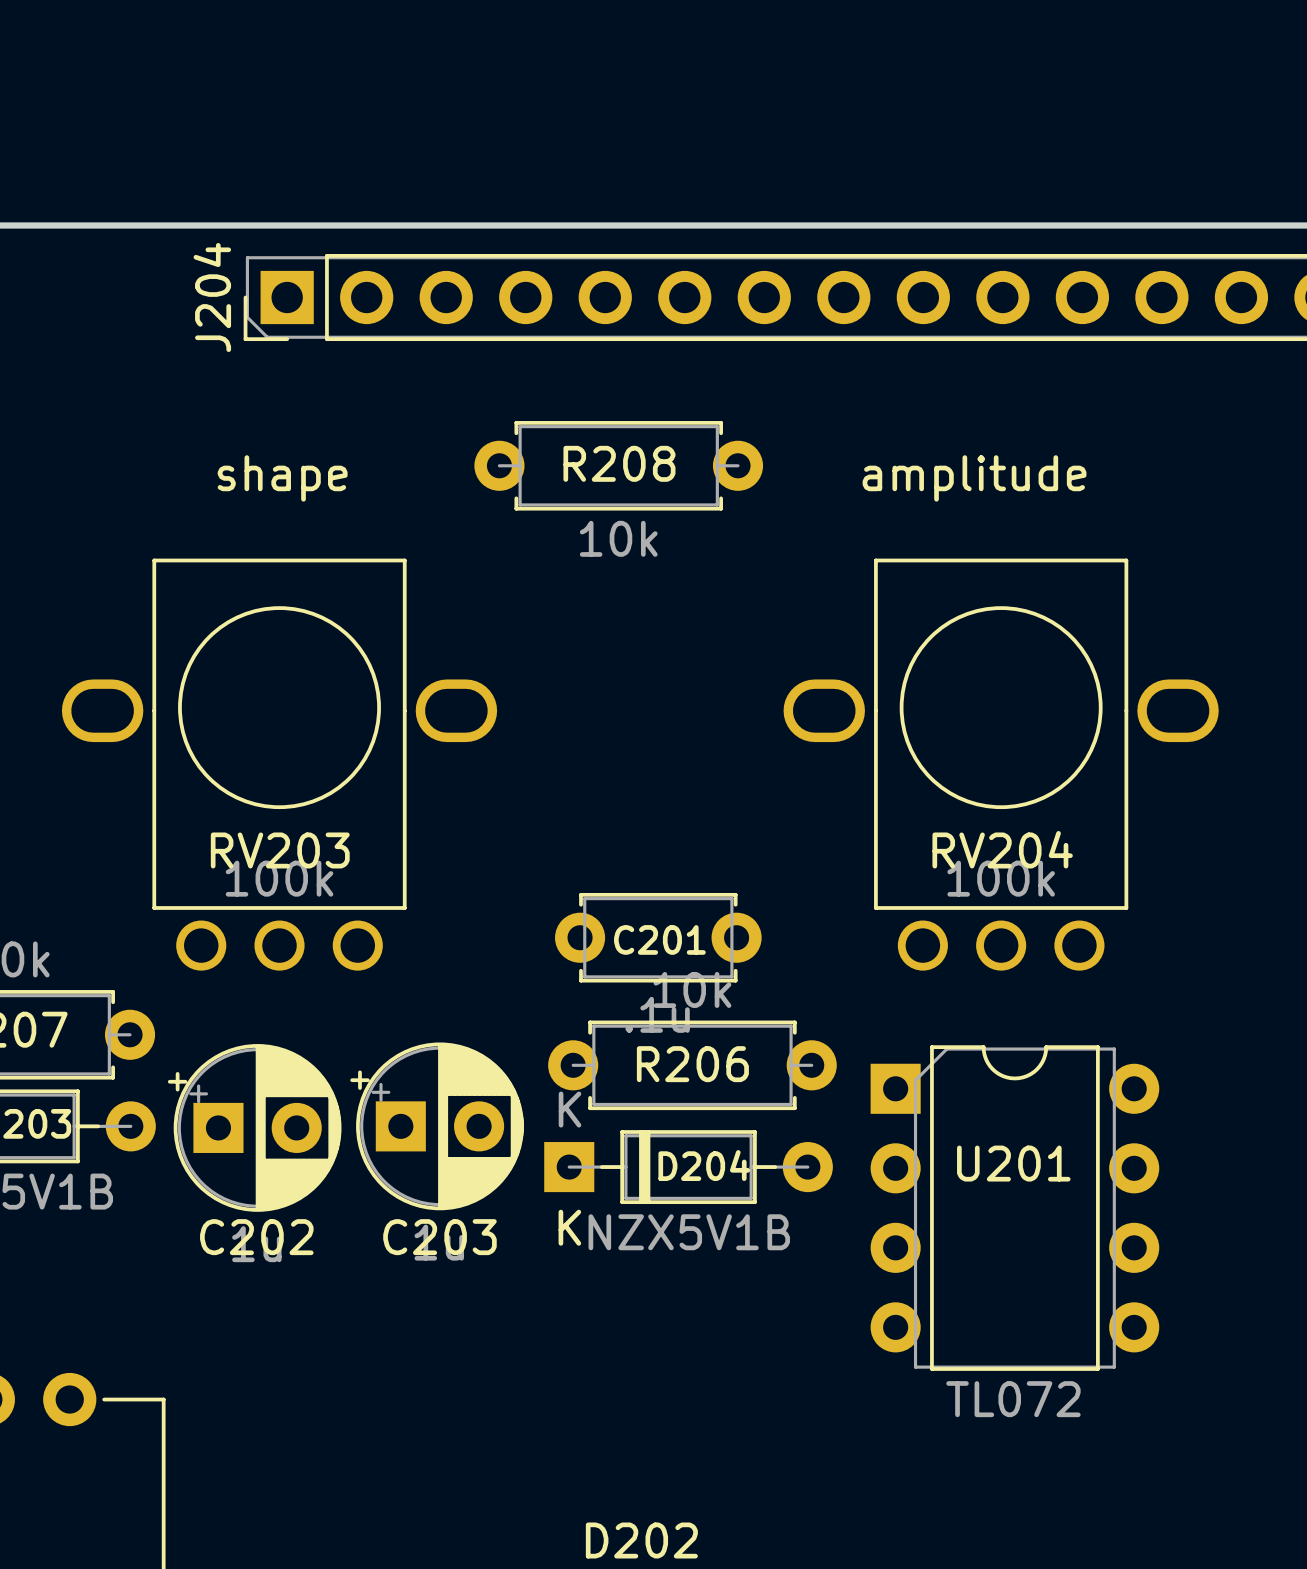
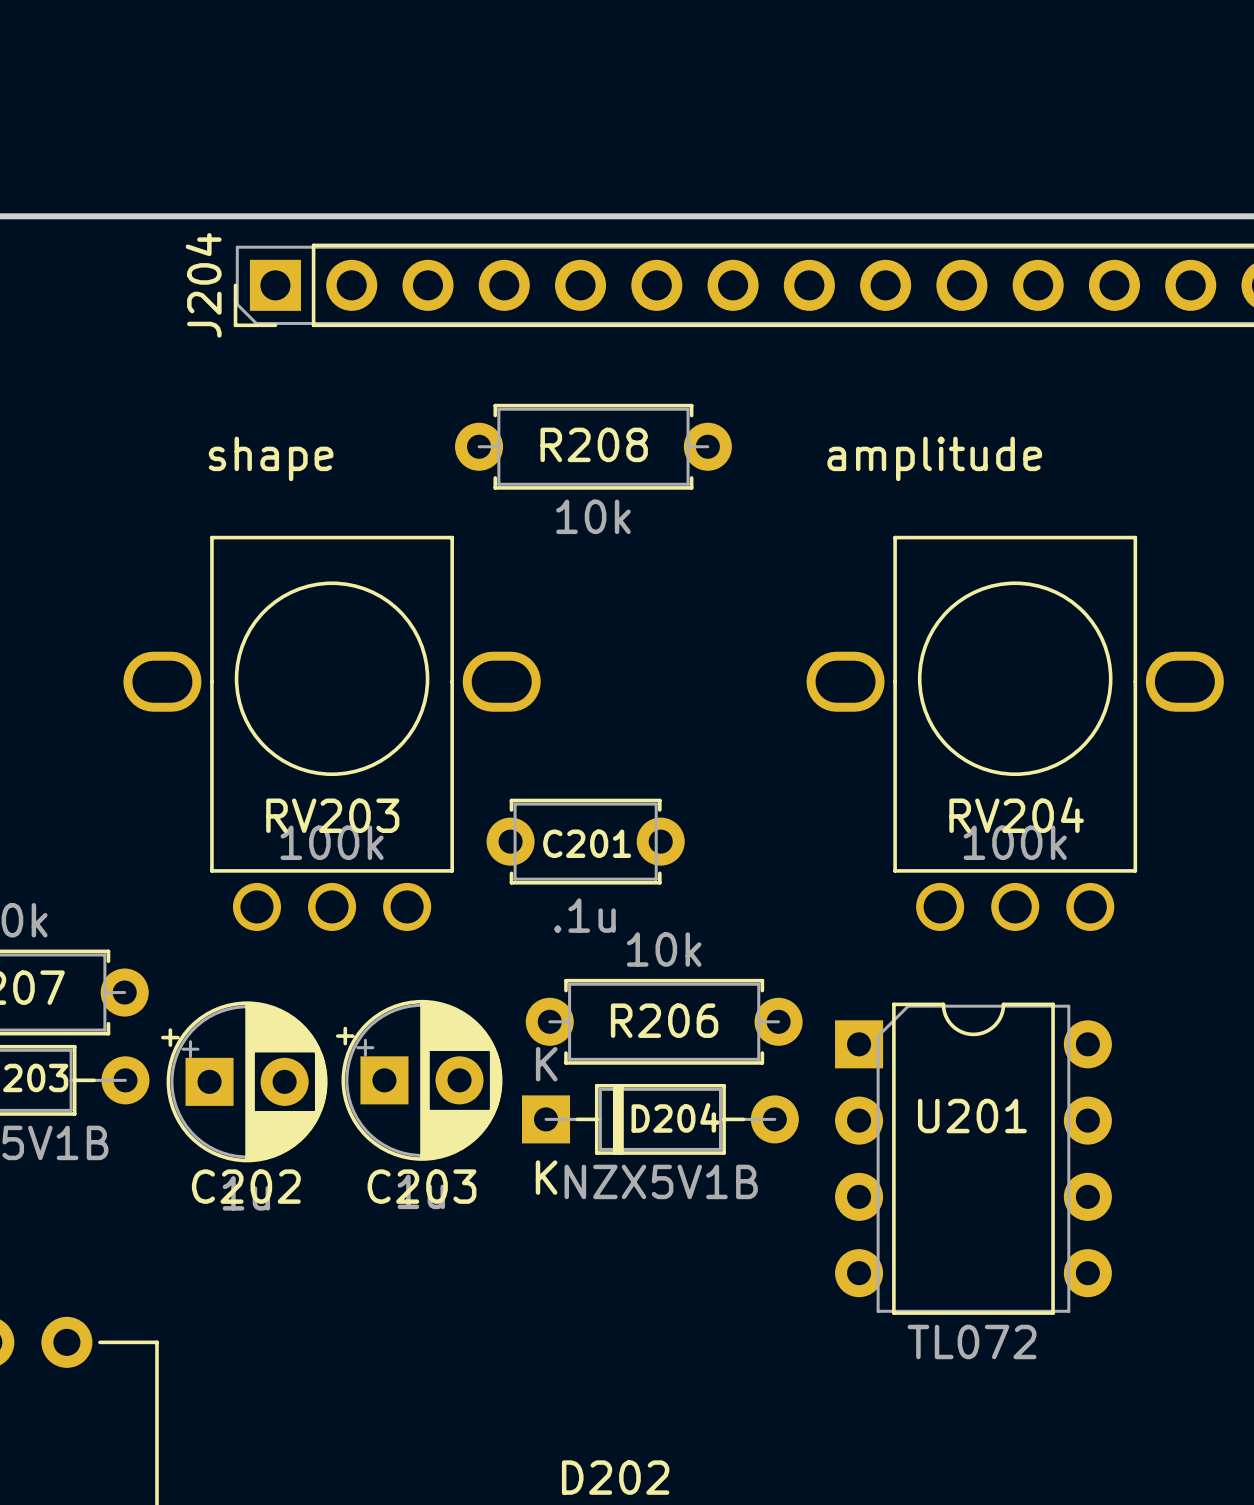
RV203 position: (279, 764) -> (332, 733)
RV204 position: (1001, 764) -> (1015, 733)
C201 position: (658, 937) -> (585, 841)

